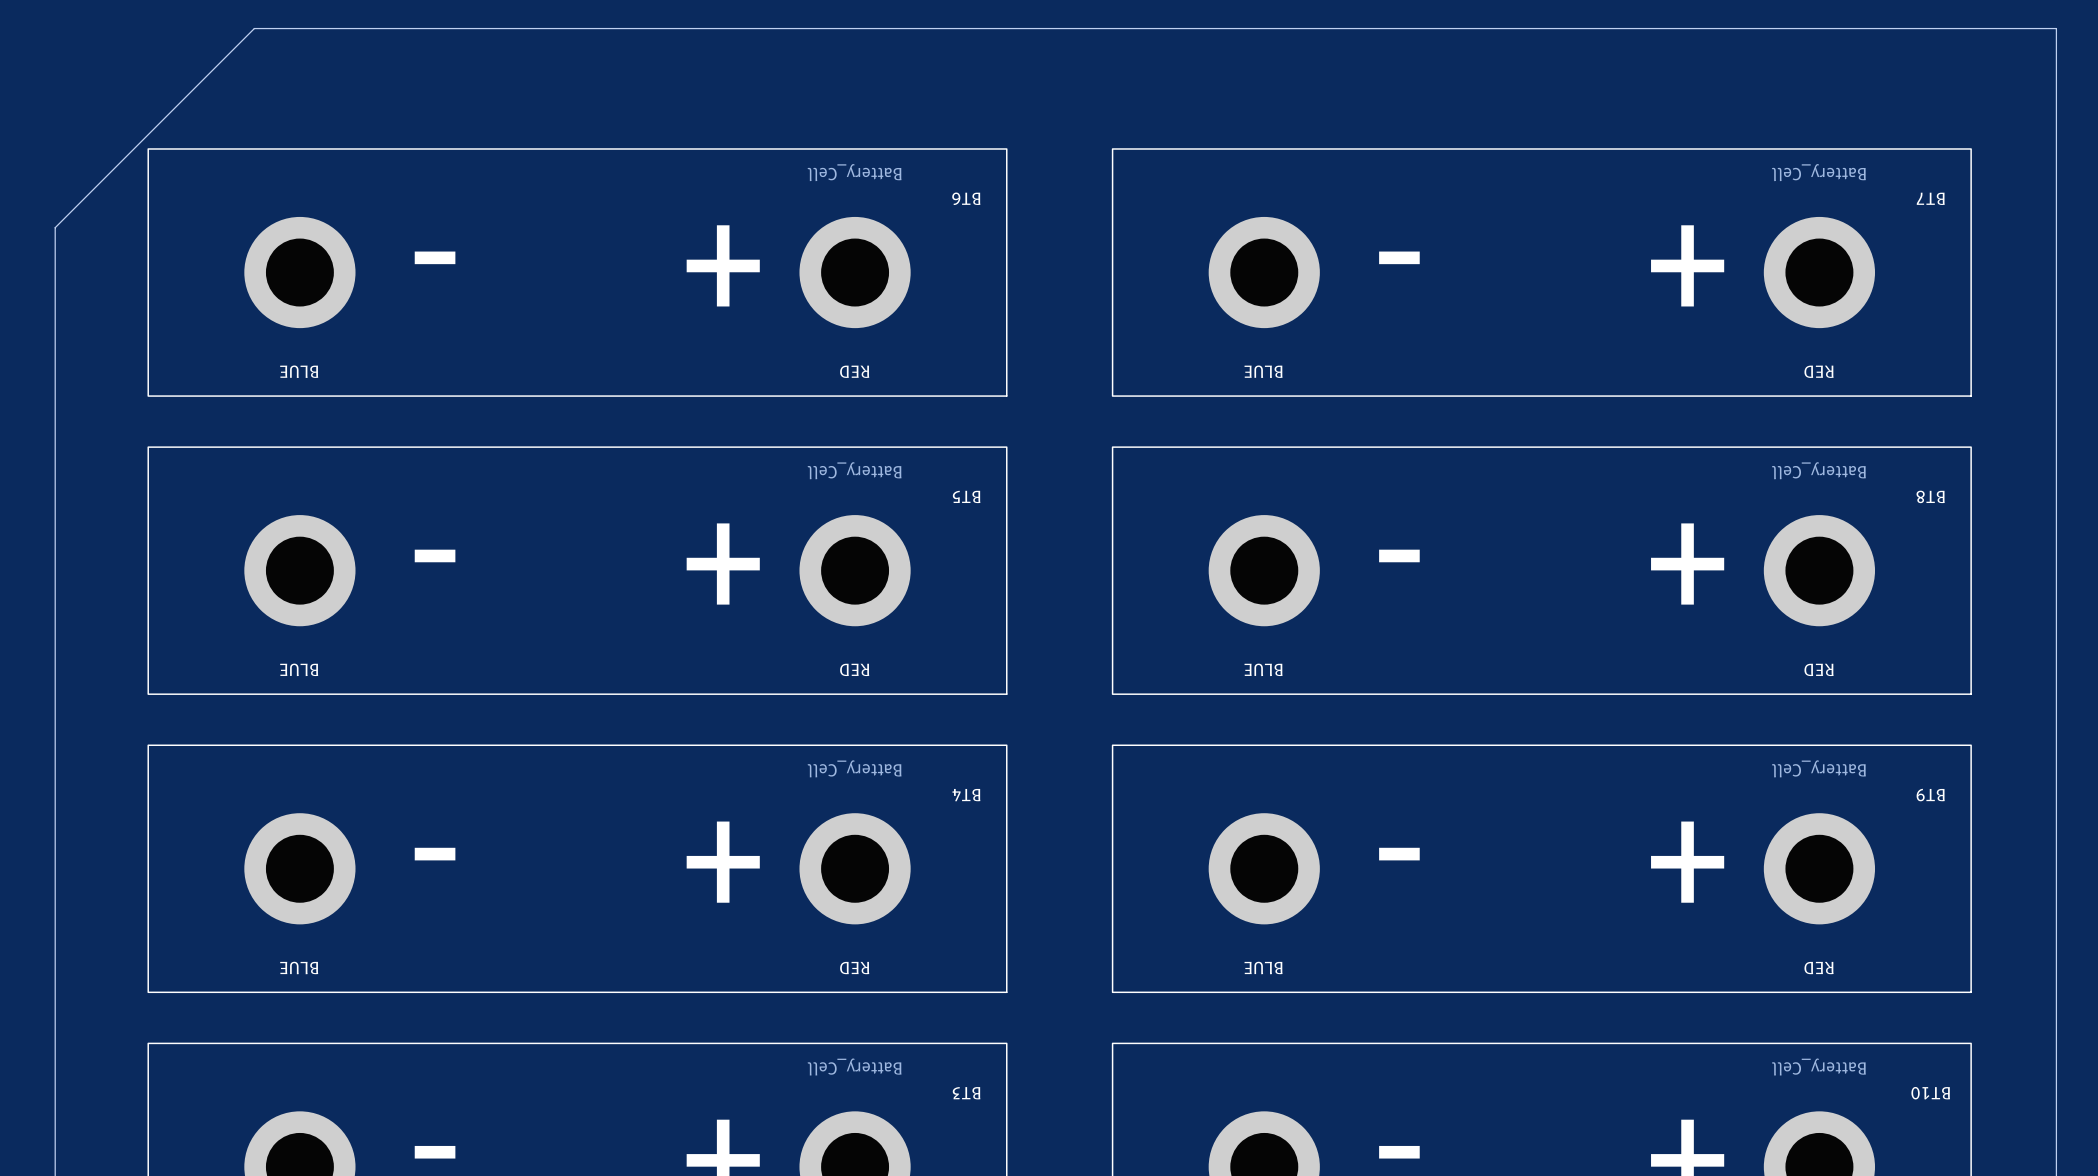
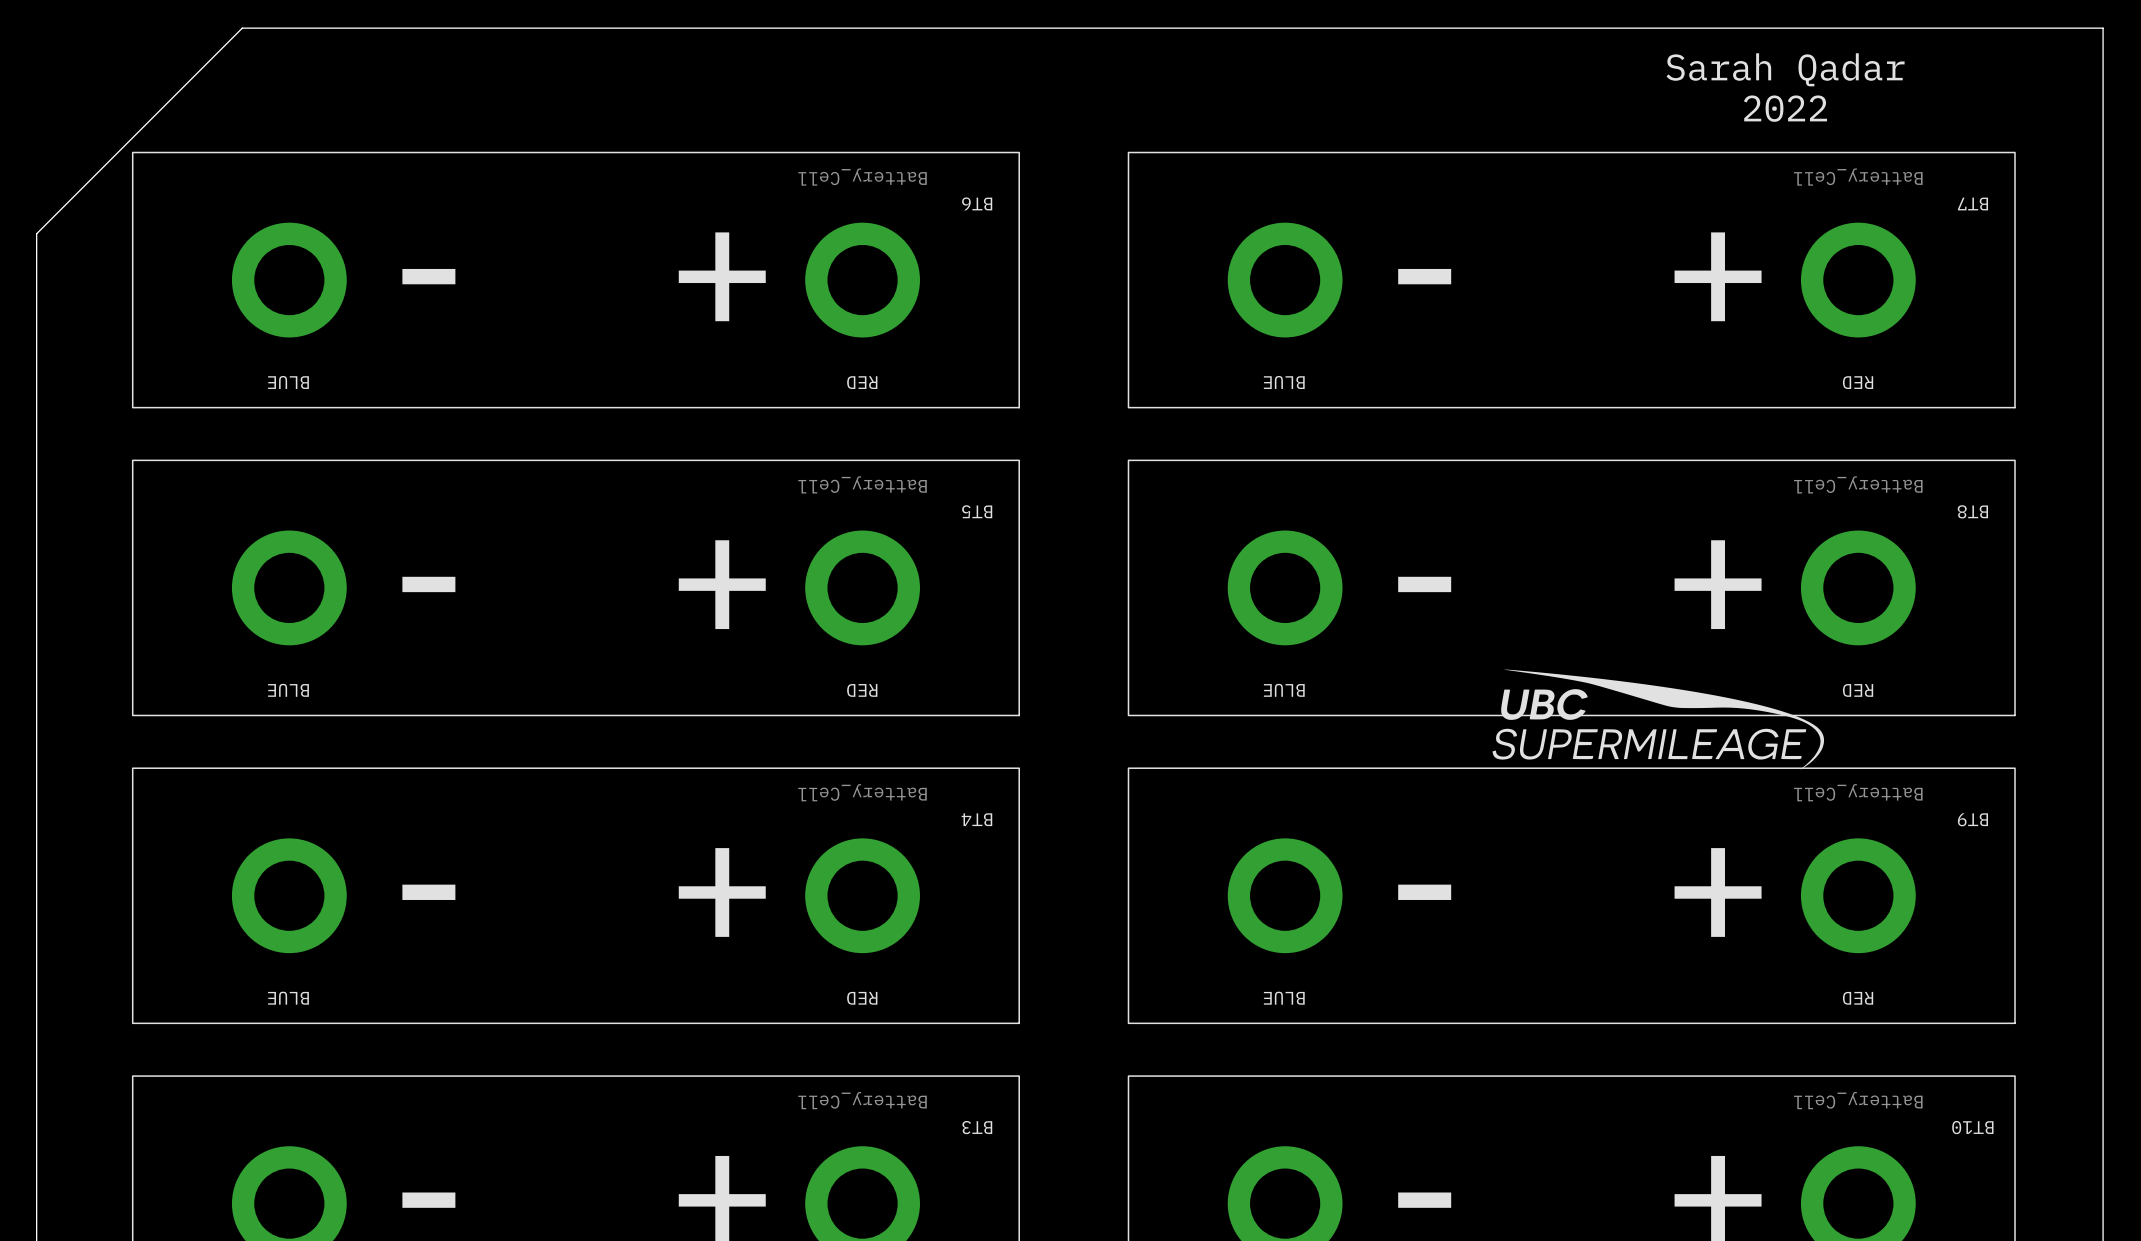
text: none -> Sarah Qadar (1785, 69)
text: none -> 2022 (1785, 108)
drawing: none -> [1492, 669, 1825, 770]

